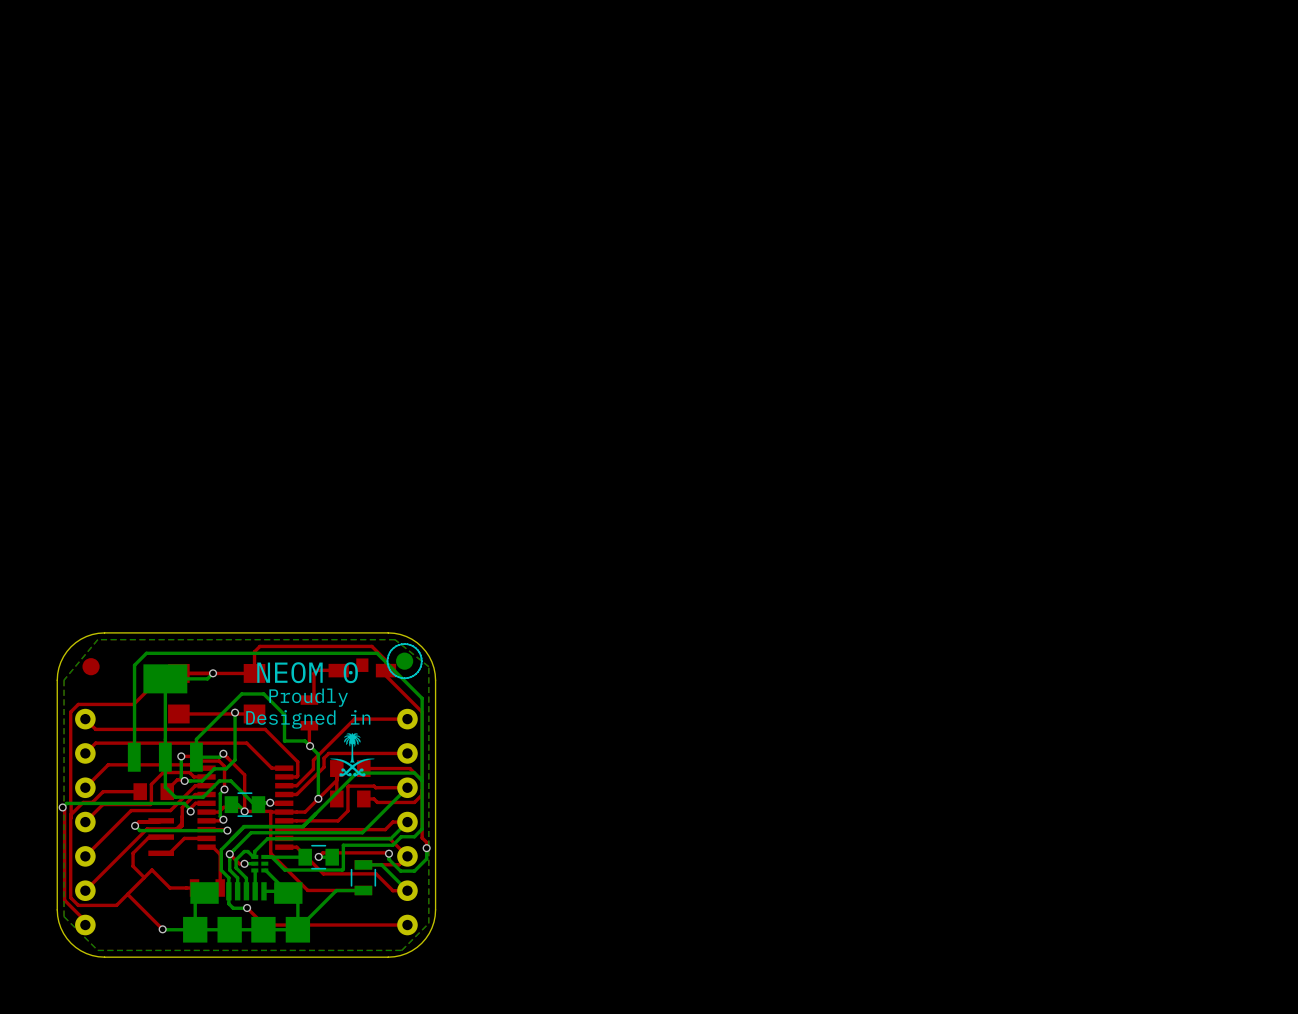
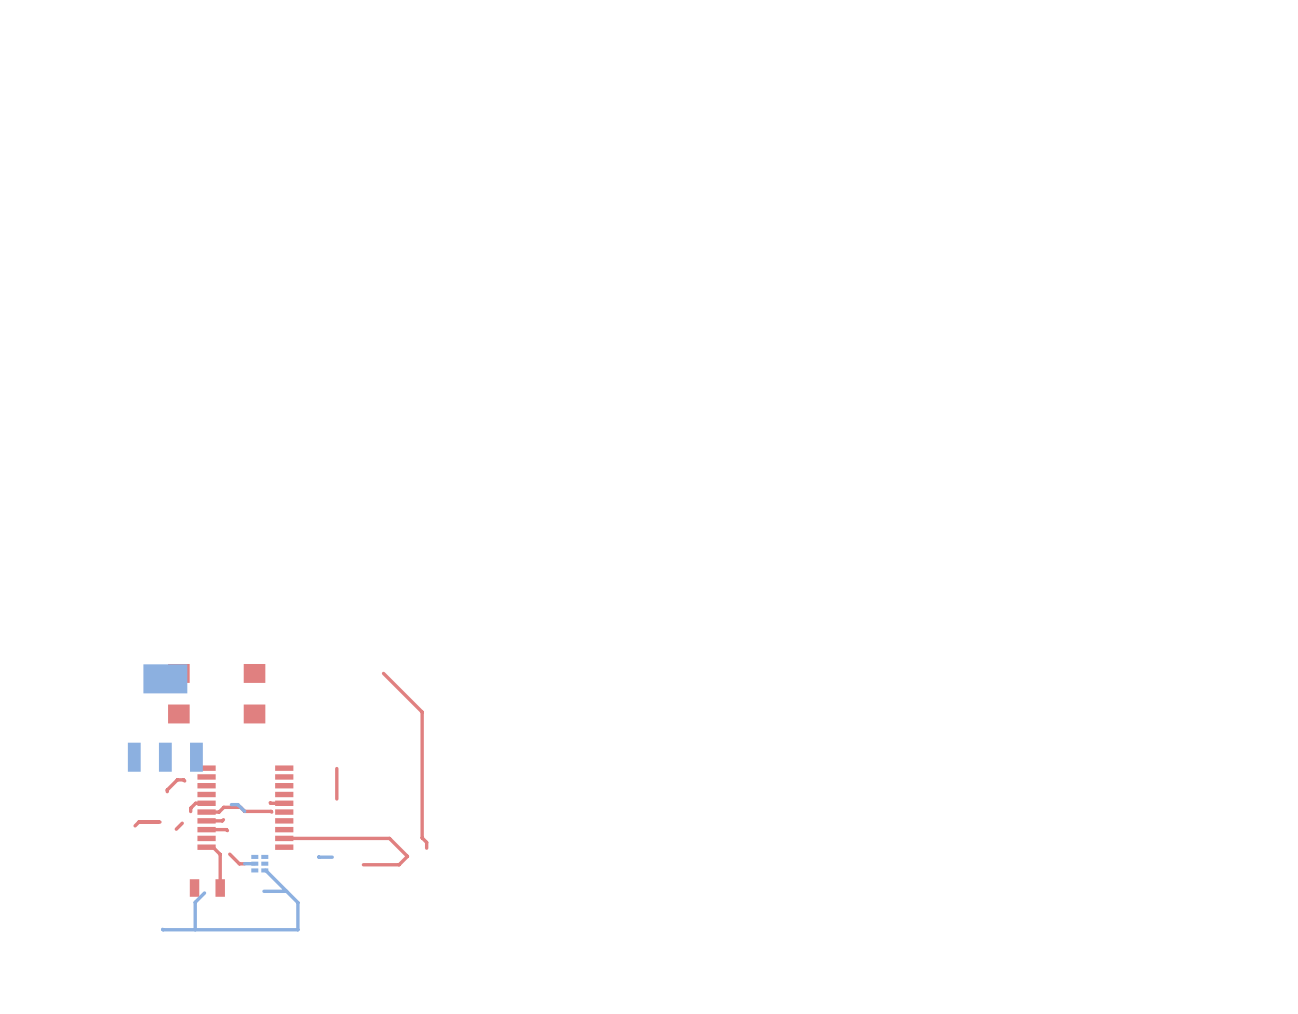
board edge: (388, 632) (104, 632) (86, 636) (71, 646) (60, 662) (57, 680) (57, 909) (60, 927) (71, 943) (86, 953) (104, 957) (388, 957) (406, 953) (421, 943) (431, 927) (435, 909) (435, 674) (429, 656) (421, 646) (406, 636) (388, 632) -> none
bottom zone outline: (395, 639) (428, 666) (428, 923) (401, 950) (97, 950) (64, 916) (64, 680) (97, 639) (395, 639) -> none
part: (404, 661) -> none
part: (91, 666) -> none
part: (362, 667) -> none
top track: (336, 670) (317, 670) (313, 673) (313, 695) (309, 700) -> none
top track: (385, 670) (385, 660) (371, 646) (259, 646) (254, 651) (254, 673) (164, 673) (133, 704) (78, 704) (70, 712) (70, 818) -> none
text: NEOM 0 (307, 672) -> none
bottom track: (213, 673) (207, 678) (165, 678) (165, 787) (175, 797) (203, 797) (219, 780) (230, 780) (252, 802) (270, 802) -> none
via: (213, 673) -> none
text: Proudly (308, 697) -> none
bottom track: (235, 712) (235, 759) (226, 768) (214, 768) (202, 780) (184, 780) (181, 777) (181, 756) -> none
via: (235, 712) -> none
part: (309, 712) -> none
top track: (254, 713) (178, 713) -> none
top track: (85, 719) (95, 729) (265, 729) (297, 761) (297, 775) (284, 776) -> none
text: Designed in (308, 719) -> none
top track: (407, 719) (354, 719) (313, 760) (313, 769) (296, 785) (284, 785) -> none
top track: (309, 725) (310, 746) -> none
drawing: [330, 733, 375, 777] -> none
via: (310, 746) -> none
top track: (85, 753) (95, 743) (246, 743) (271, 768) (284, 768) -> none
bottom track: (223, 753) (219, 757) (196, 757) (196, 739) (241, 693) (263, 693) (284, 714) (284, 741) (304, 741) (318, 754) (318, 798) -> none
top track: (223, 753) (244, 775) (244, 811) -> none
via: (223, 753) -> none
top track: (407, 753) (328, 753) (324, 758) (324, 767) (296, 794) (284, 794) -> none
top track: (181, 756) (191, 756) (196, 761) (219, 761) (224, 766) (224, 789) -> none
via: (181, 756) -> none
bottom track: (134, 757) (134, 665) (146, 653) (377, 653) (422, 698) (422, 829) (414, 836) (401, 836) (392, 845) (343, 845) (342, 870) (284, 870) (271, 856) (264, 856) (265, 857) (305, 857) -> none
top track: (206, 768) (194, 768) (190, 764) (108, 764) (85, 787) -> none
part: (350, 768) -> none
top track: (363, 768) (410, 768) (422, 780) -> none
top track: (206, 776) (194, 776) (189, 772) (163, 772) (151, 784) (150, 804) (102, 804) (85, 822) -> none
via: (184, 780) -> none
top track: (336, 780) (305, 812) (270, 813) (270, 853) (307, 890) (363, 890) -> none
bottom track: (422, 780) (414, 773) (356, 773) (302, 826) (244, 826) (221, 849) (221, 870) (228, 877) (228, 903) (233, 908) (247, 908) -> none
top track: (206, 785) (195, 785) (170, 810) (131, 810) (85, 856) -> none
bottom track: (407, 787) (362, 832) (251, 832) (229, 854) (229, 870) (237, 878) (237, 891) -> none
top track: (407, 787) (348, 786) (347, 810) (338, 820) (284, 820) -> none
bottom track: (224, 789) (220, 793) (220, 816) (223, 819) -> none
via: (224, 789) -> none
top track: (140, 791) (103, 791) (92, 802) (83, 802) (70, 815) (70, 897) (78, 905) (116, 905) (151, 869) (170, 888) (194, 888) -> none
part: (153, 791) -> none
top track: (206, 794) (195, 794) (182, 807) (182, 825) (179, 828) (147, 828) (85, 890) -> none
top track: (422, 794) (414, 802) (377, 802) (373, 798) (363, 798) -> none
via: (318, 798) -> none
part: (350, 798) -> none
via: (270, 802) -> none
part: (244, 804) -> none
bottom track: (62, 807) (66, 803) (184, 803) (190, 811) -> none
top track: (62, 807) (64, 809) (64, 900) (85, 921) (85, 925) -> none
via: (62, 807) -> none
via: (190, 811) -> none
via: (244, 811) -> none
via: (223, 819) -> none
part: (85, 822) -> none
bottom track: (407, 822) (390, 838) (267, 838) (254, 851) (254, 856) (247, 851) (244, 851) (236, 859) (236, 867) (246, 878) (246, 891) -> none
top track: (407, 822) (392, 822) (385, 829) (284, 829) -> none
part: (407, 822) -> none
bottom track: (135, 825) (139, 830) (227, 830) -> none
via: (135, 825) -> none
via: (227, 830) -> none
part: (161, 837) -> none
top track: (158, 838) (148, 838) (133, 853) (133, 866) (144, 877) -> none
top track: (206, 838) (184, 838) (168, 854) (158, 854) -> none
top track: (284, 847) (296, 847) (323, 873) (376, 873) (392, 890) (407, 890) -> none
bottom track: (426, 848) (426, 858) (414, 871) (400, 871) (388, 859) (388, 853) -> none
via: (426, 848) -> none
top track: (388, 853) (322, 852) (318, 856) -> none
via: (388, 853) -> none
via: (229, 854) -> none
via: (318, 856) -> none
part: (318, 857) -> none
via: (244, 863) -> none
bottom track: (363, 864) (381, 864) (407, 890) -> none
bottom track: (254, 870) (255, 891) -> none
part: (363, 877) -> none
bottom track: (363, 890) (336, 890) (297, 929) -> none
top track: (128, 893) (162, 929) -> none
top track: (247, 908) (264, 925) (407, 925) -> none
via: (247, 908) -> none
part: (246, 912) -> none
via: (162, 929) -> none

